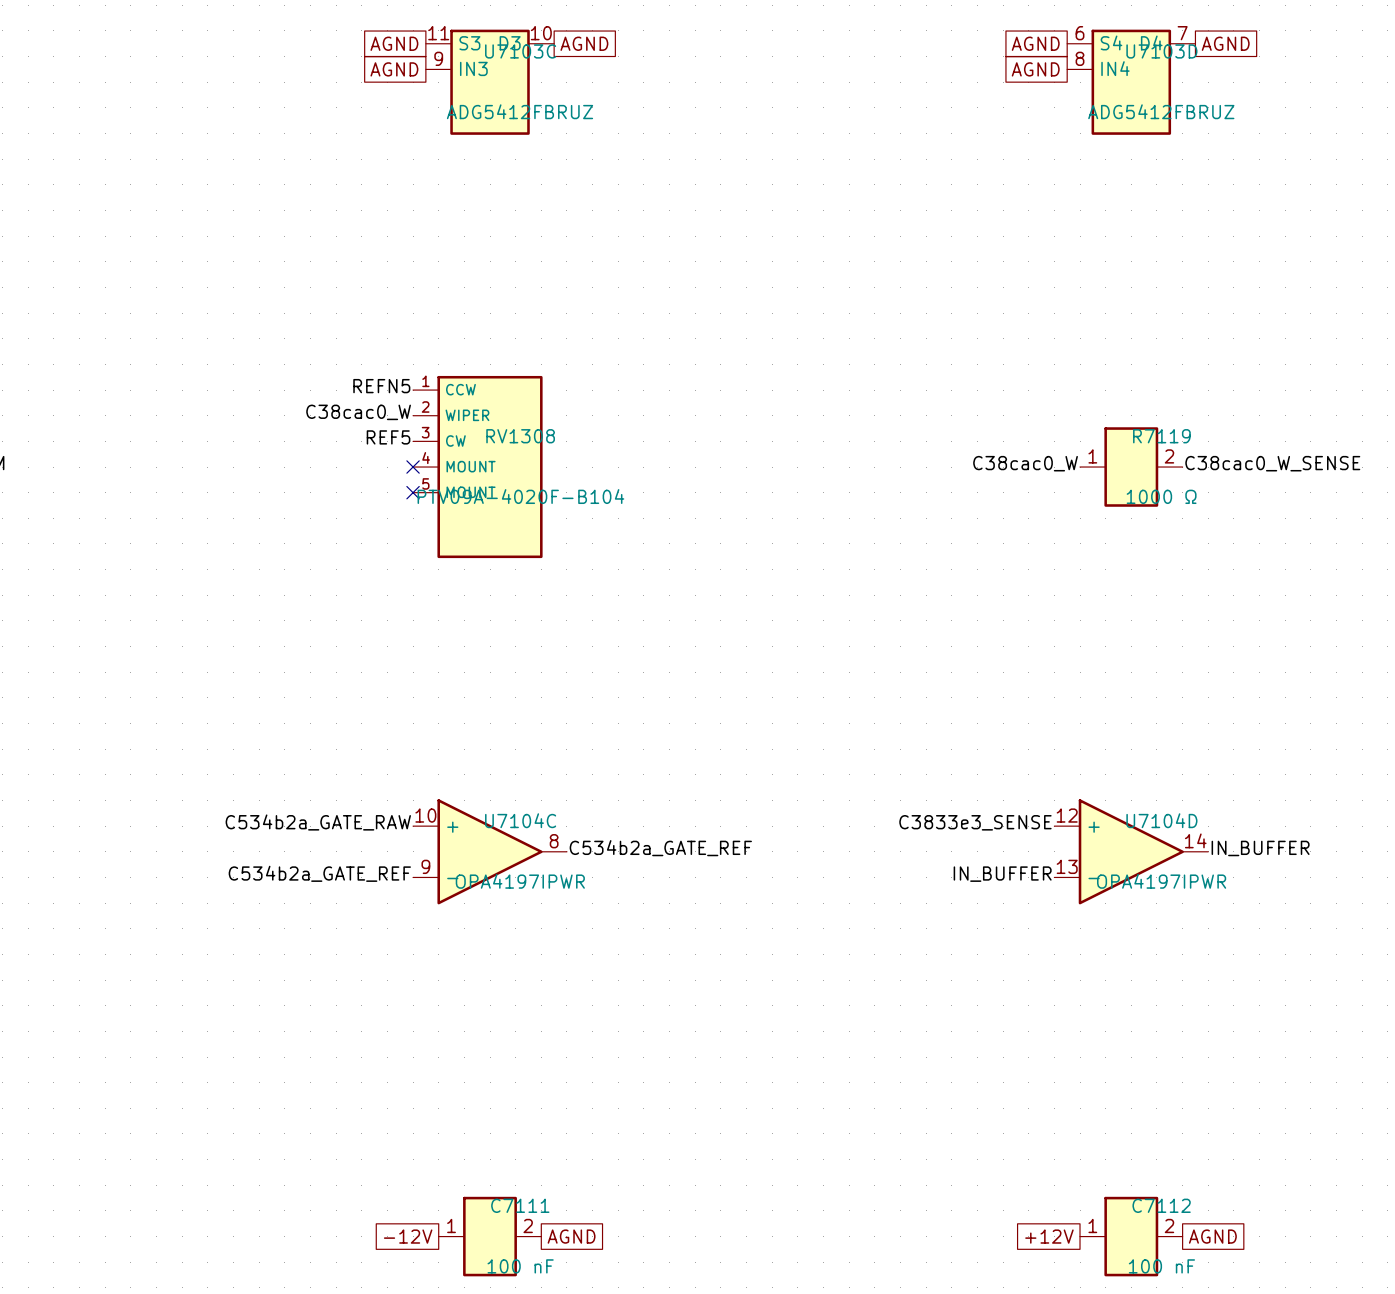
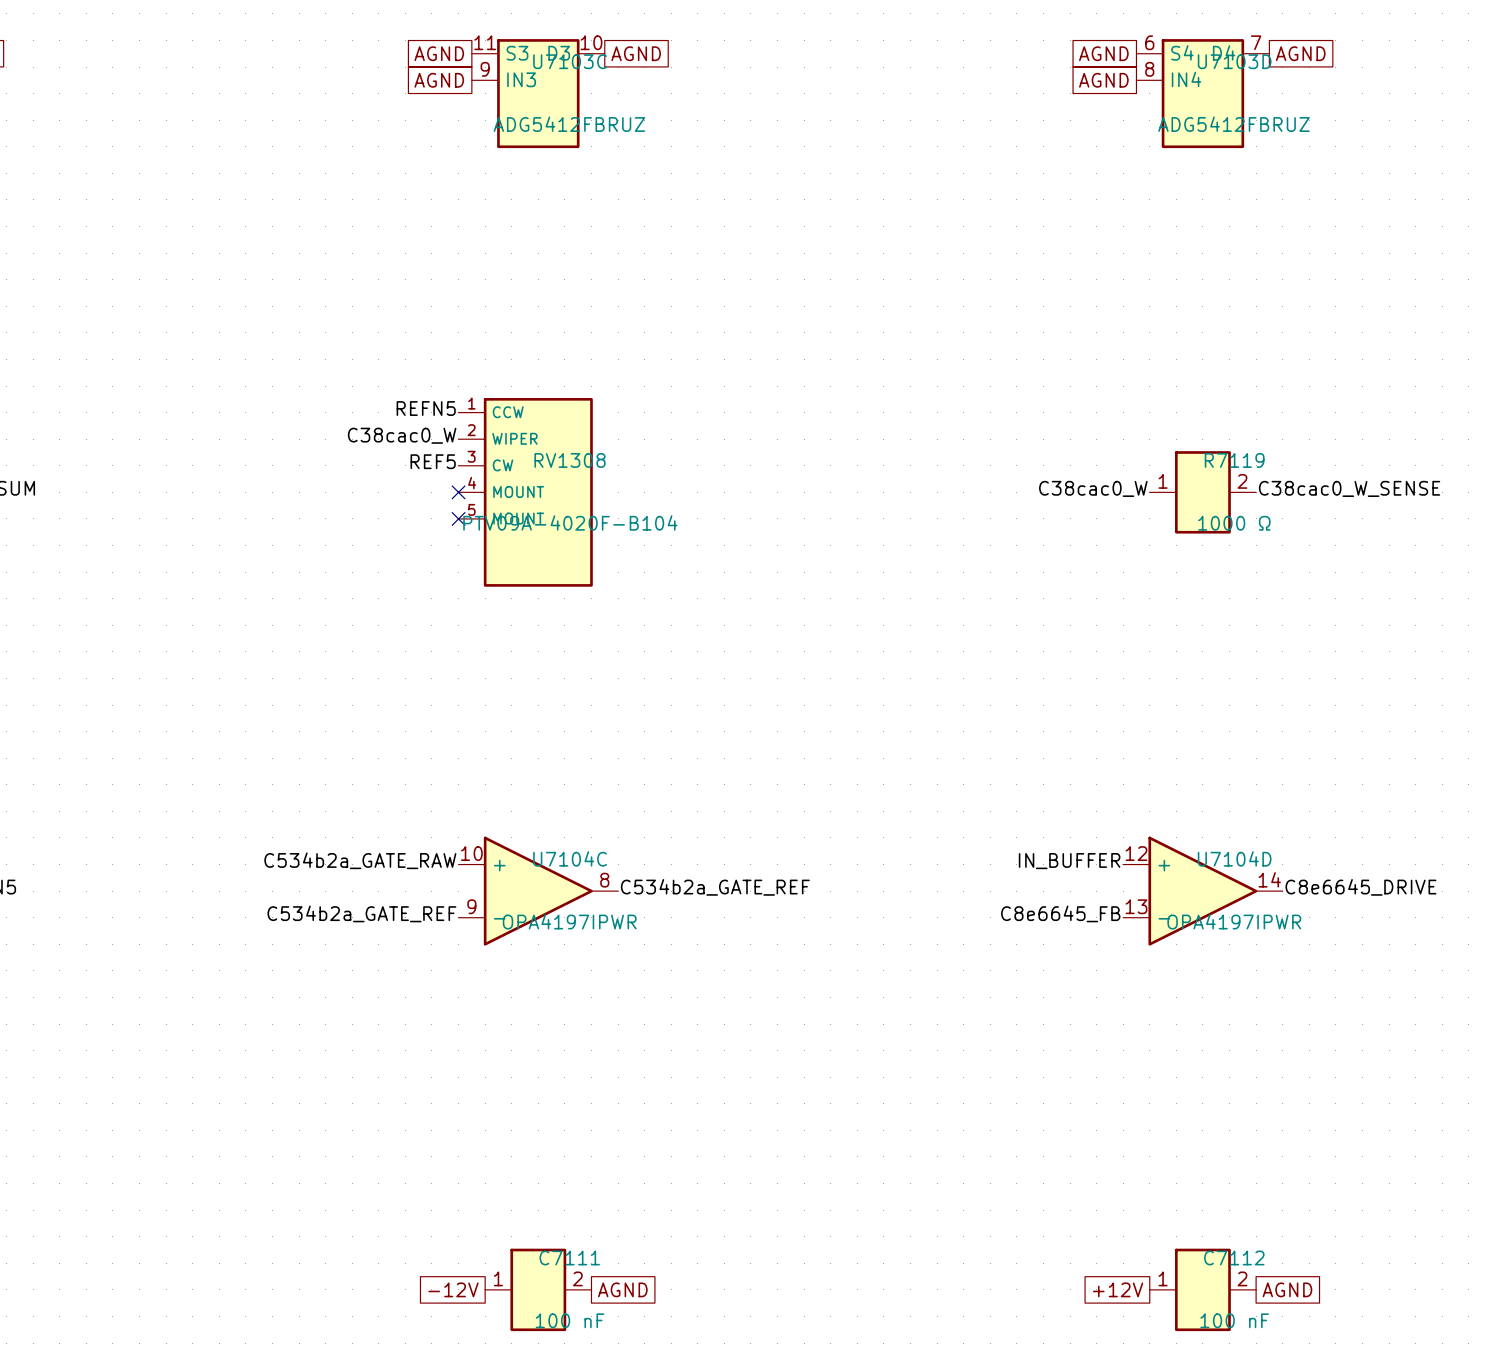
label: C3833e3_SENSE (975, 822) -> IN_BUFFER (1069, 861)
label: IN_BUFFER (1260, 848) -> C8e6645_DRIVE (1360, 887)
label: IN_BUFFER (1002, 874) -> C8e6645_FB (1060, 913)

